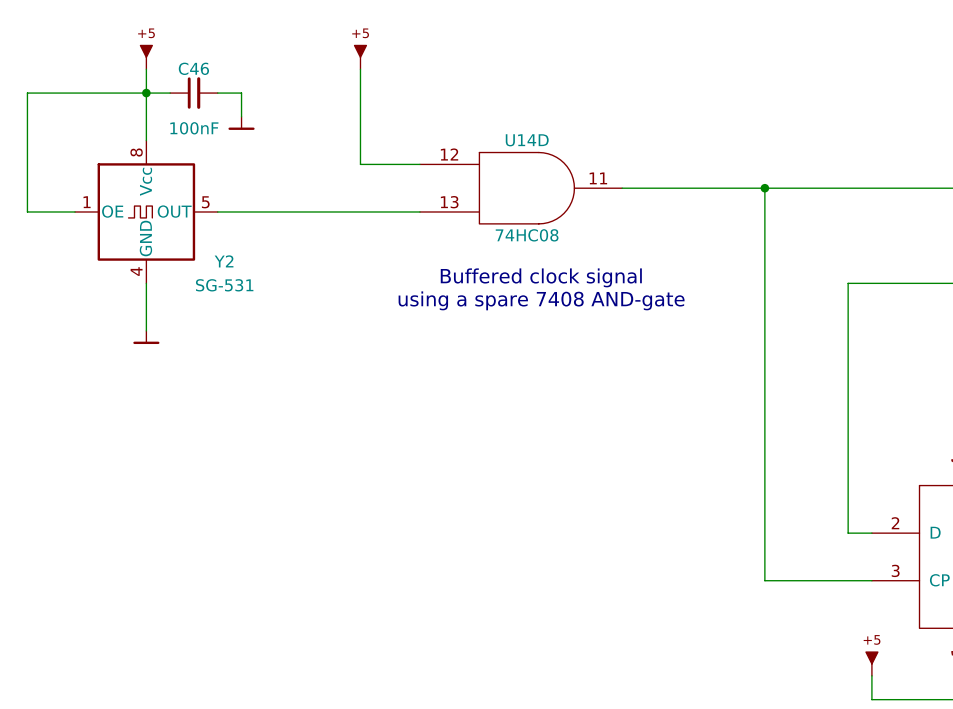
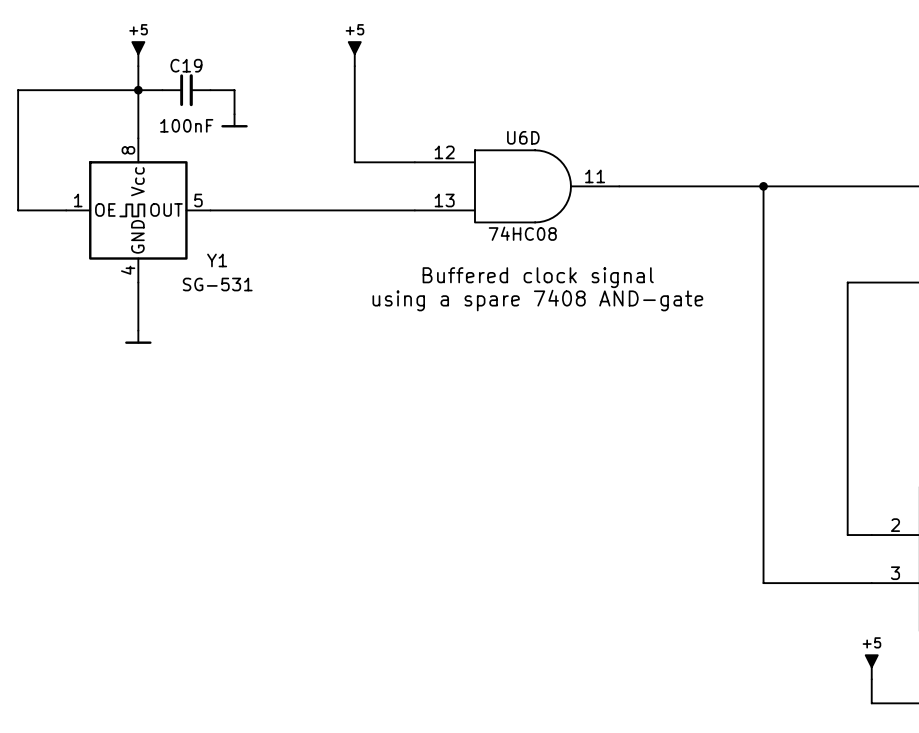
C46 name: C46 (193, 68) -> C19 (186, 65)
U14D name: U14D (527, 140) -> U6D (523, 137)
Y2 name: Y2 (224, 261) -> Y1 (217, 260)

